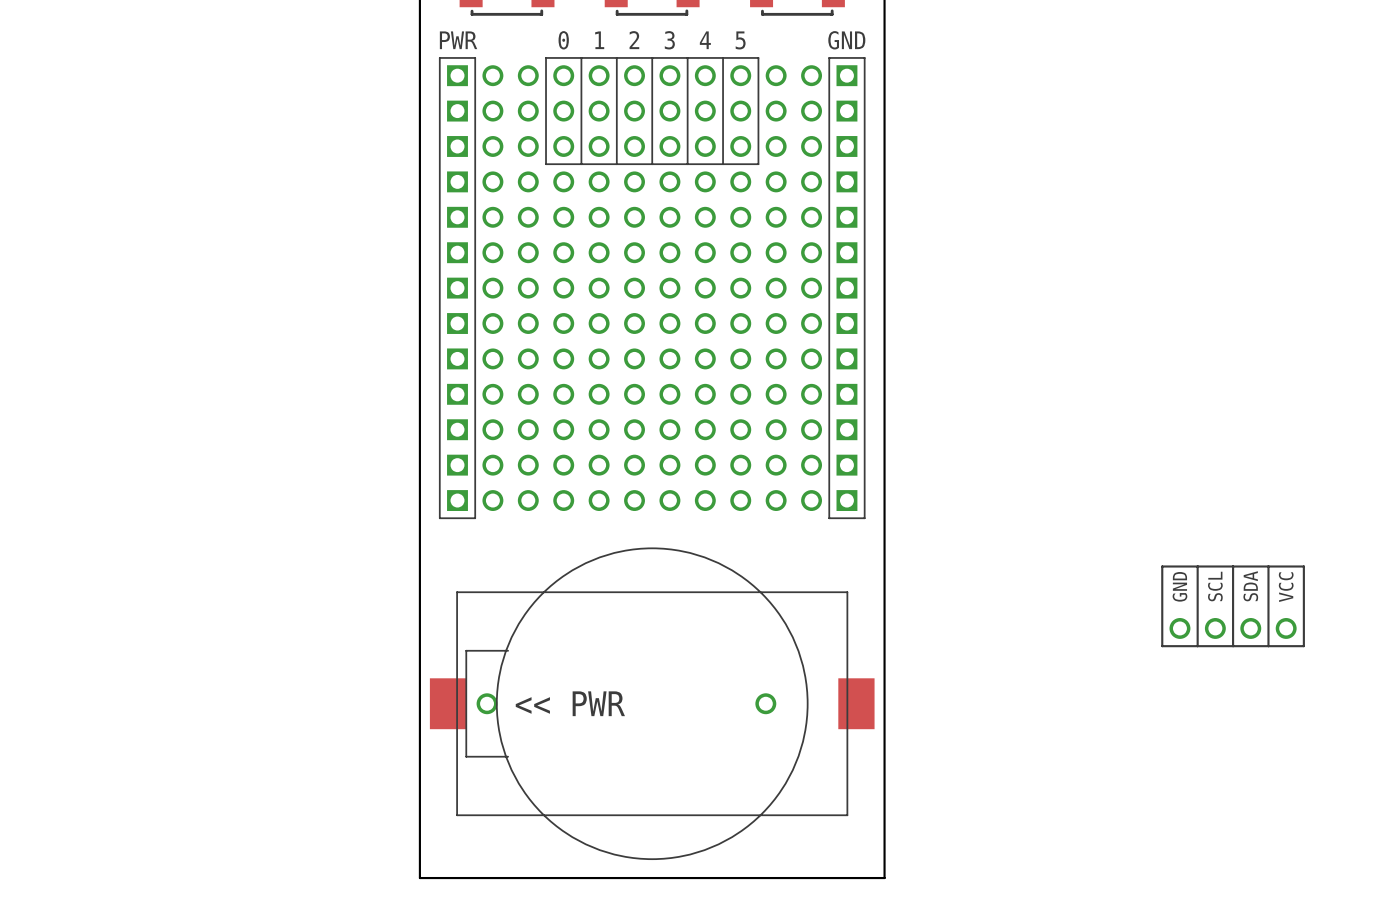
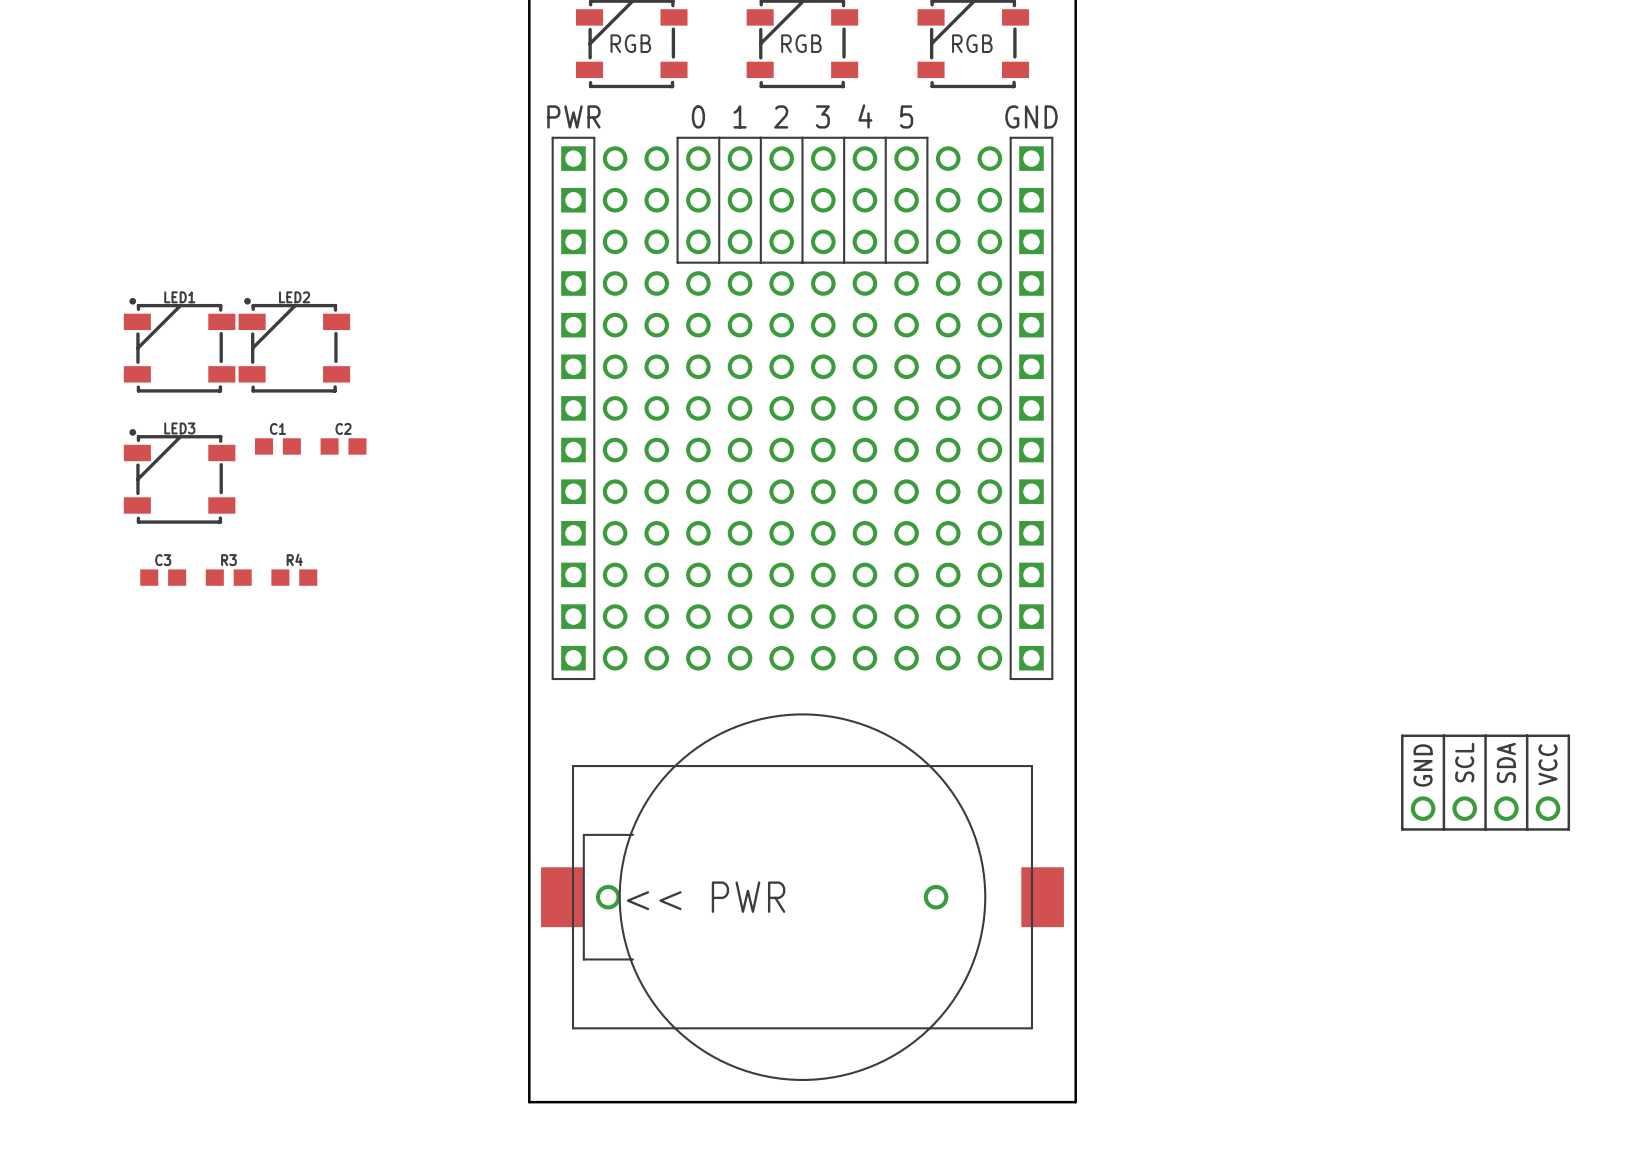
LED1: none -> (179, 345)
LED2: none -> (294, 345)
C1: none -> (277, 446)
C2: none -> (343, 446)
LED3: none -> (179, 476)
C3: none -> (163, 577)
R3: none -> (228, 577)
R4: none -> (294, 577)

